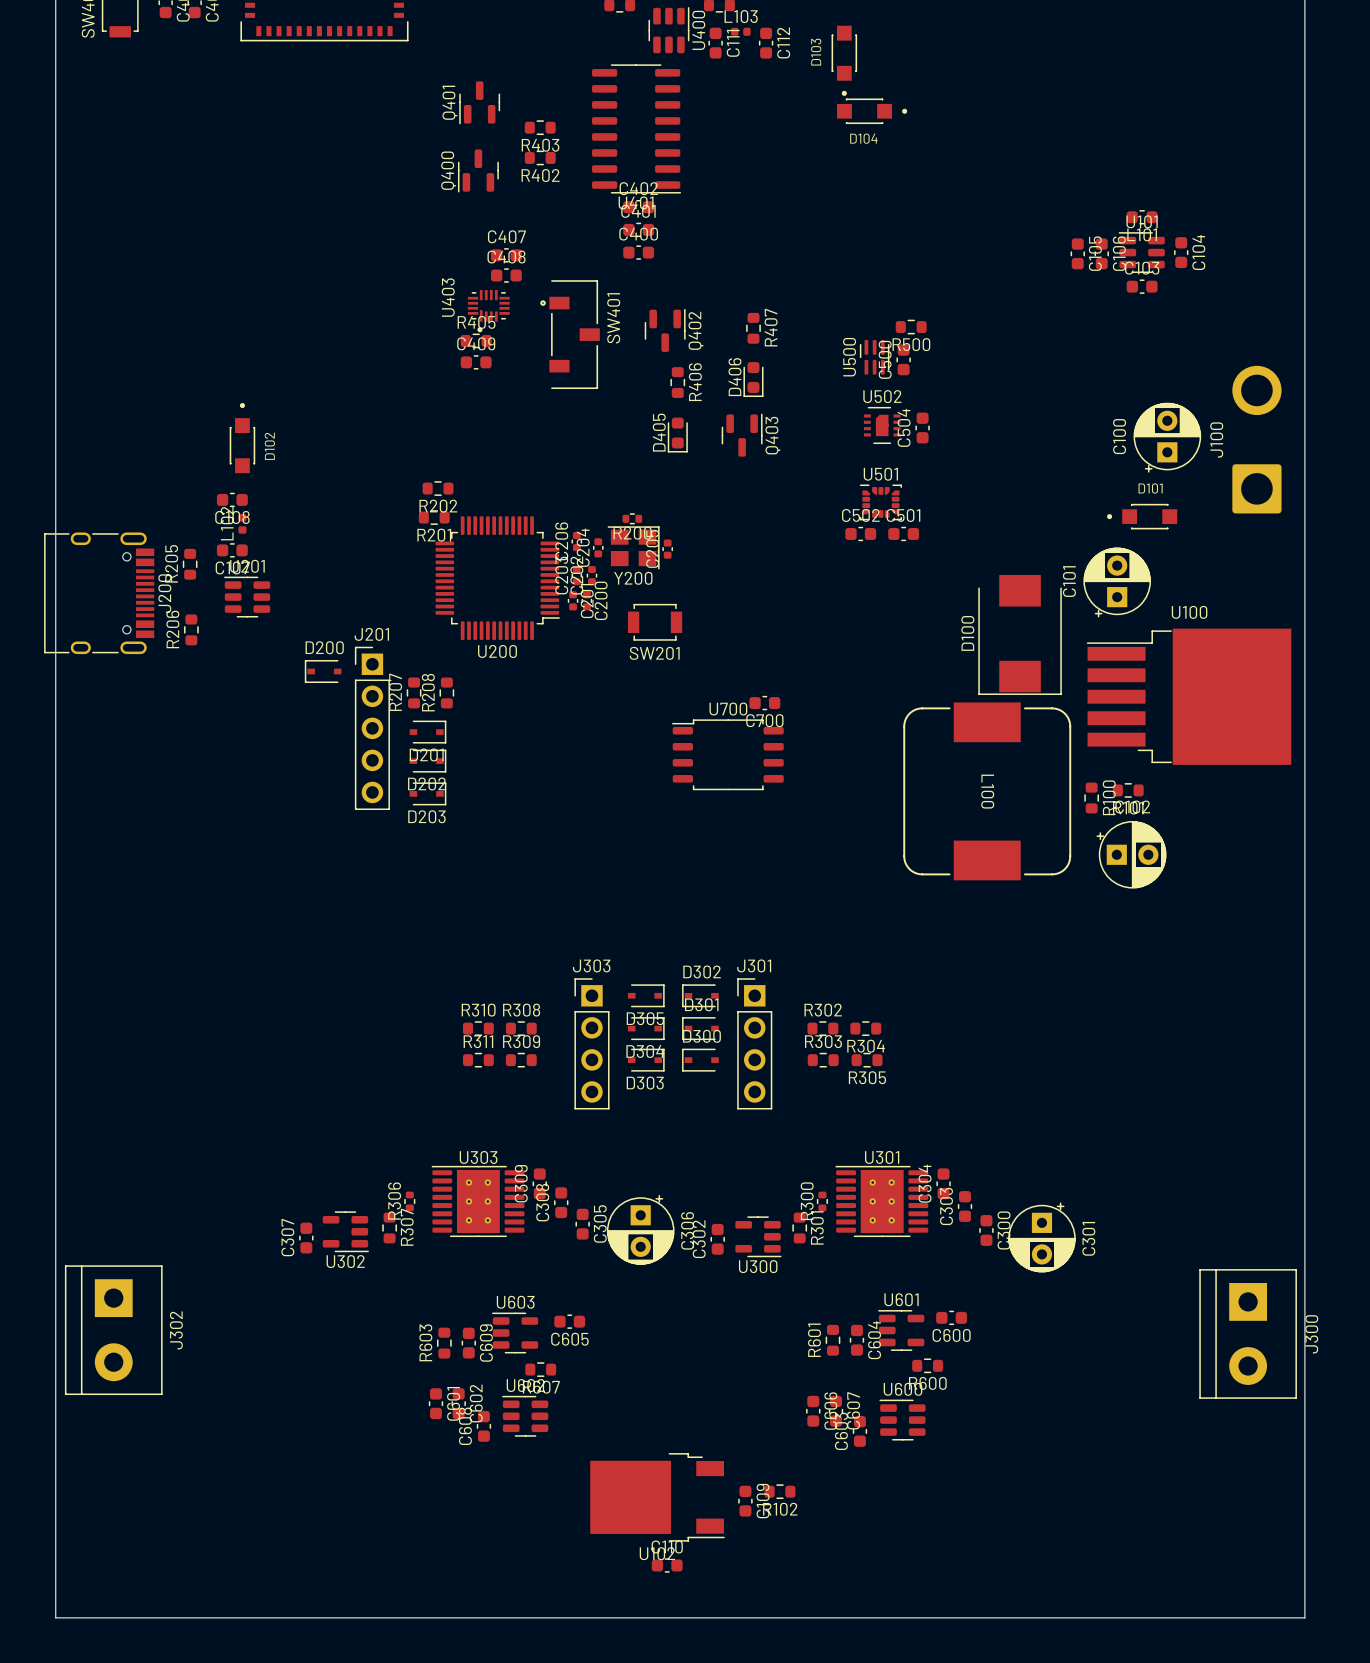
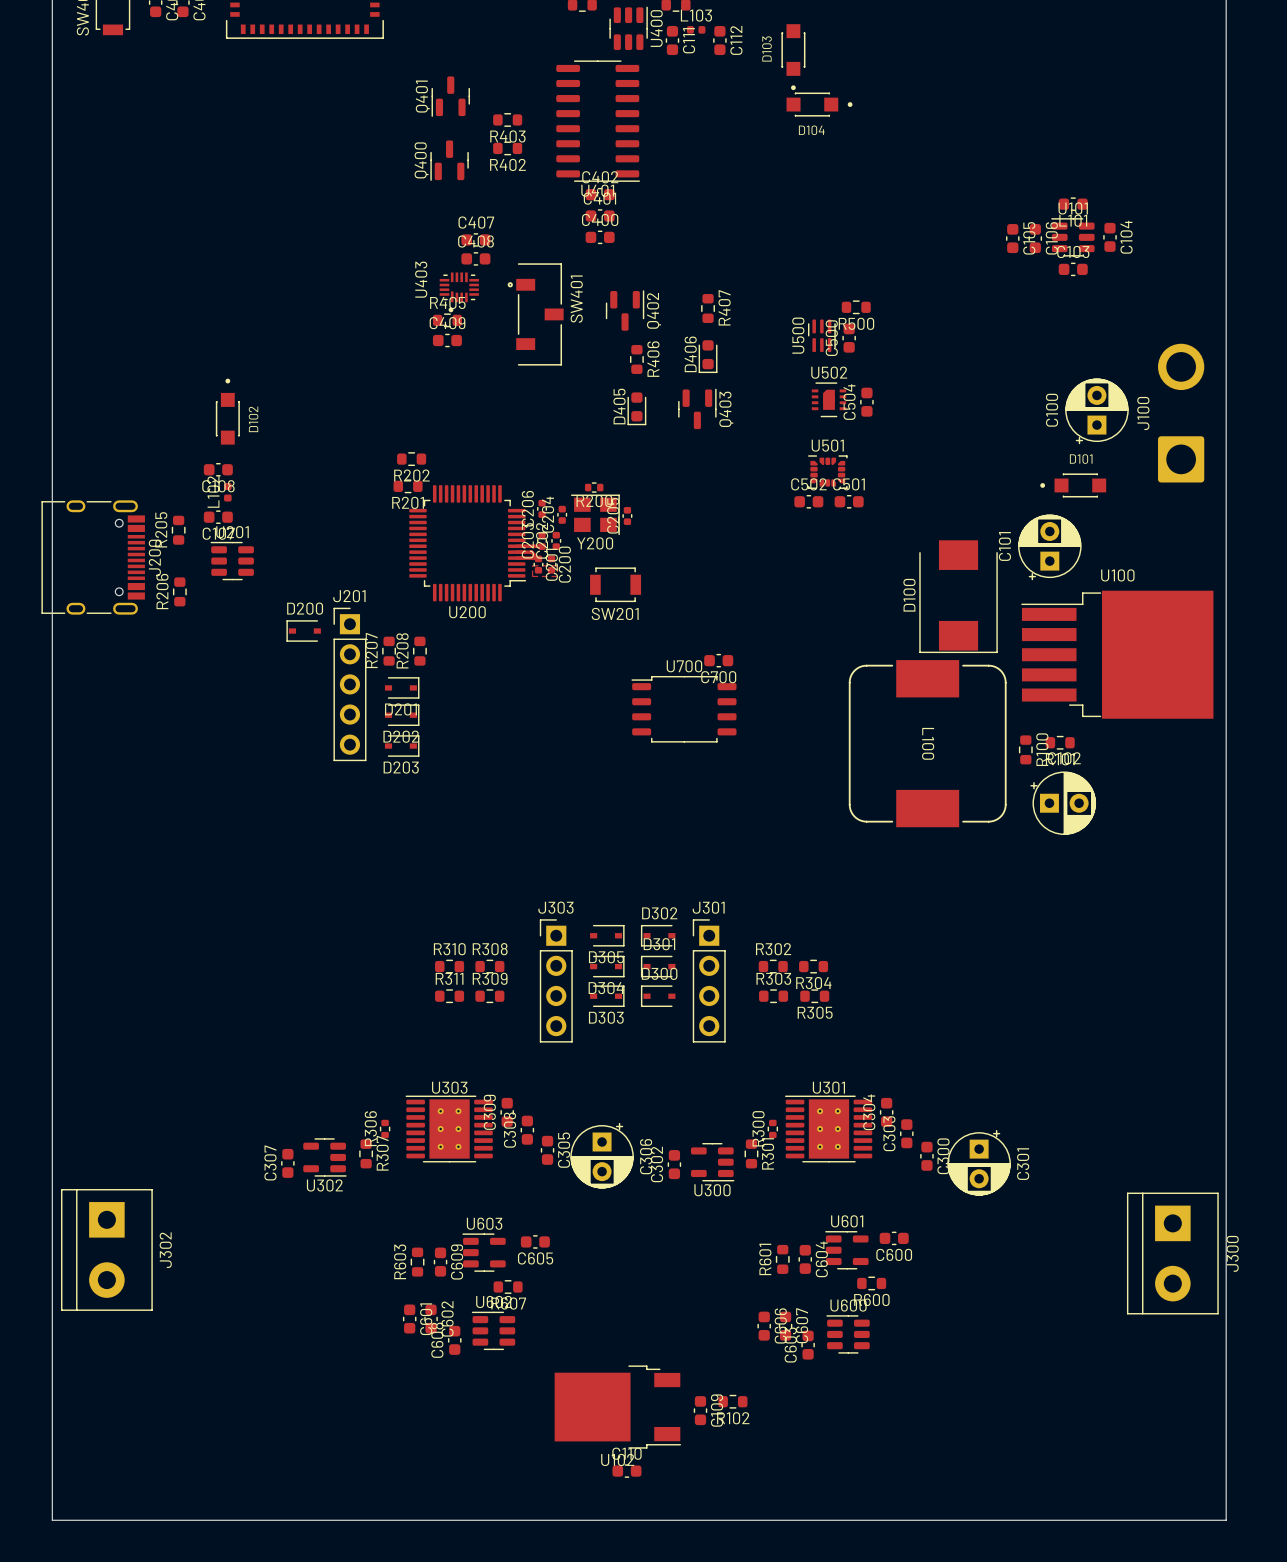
top track: none -> (516, 546) (542, 546)
top track: none -> (516, 552) (531, 552) (538, 558)
top track: none -> (516, 558) (537, 558)
top zone outline: none -> (532, 565) (532, 576) (557, 576) (557, 565) (532, 565)

